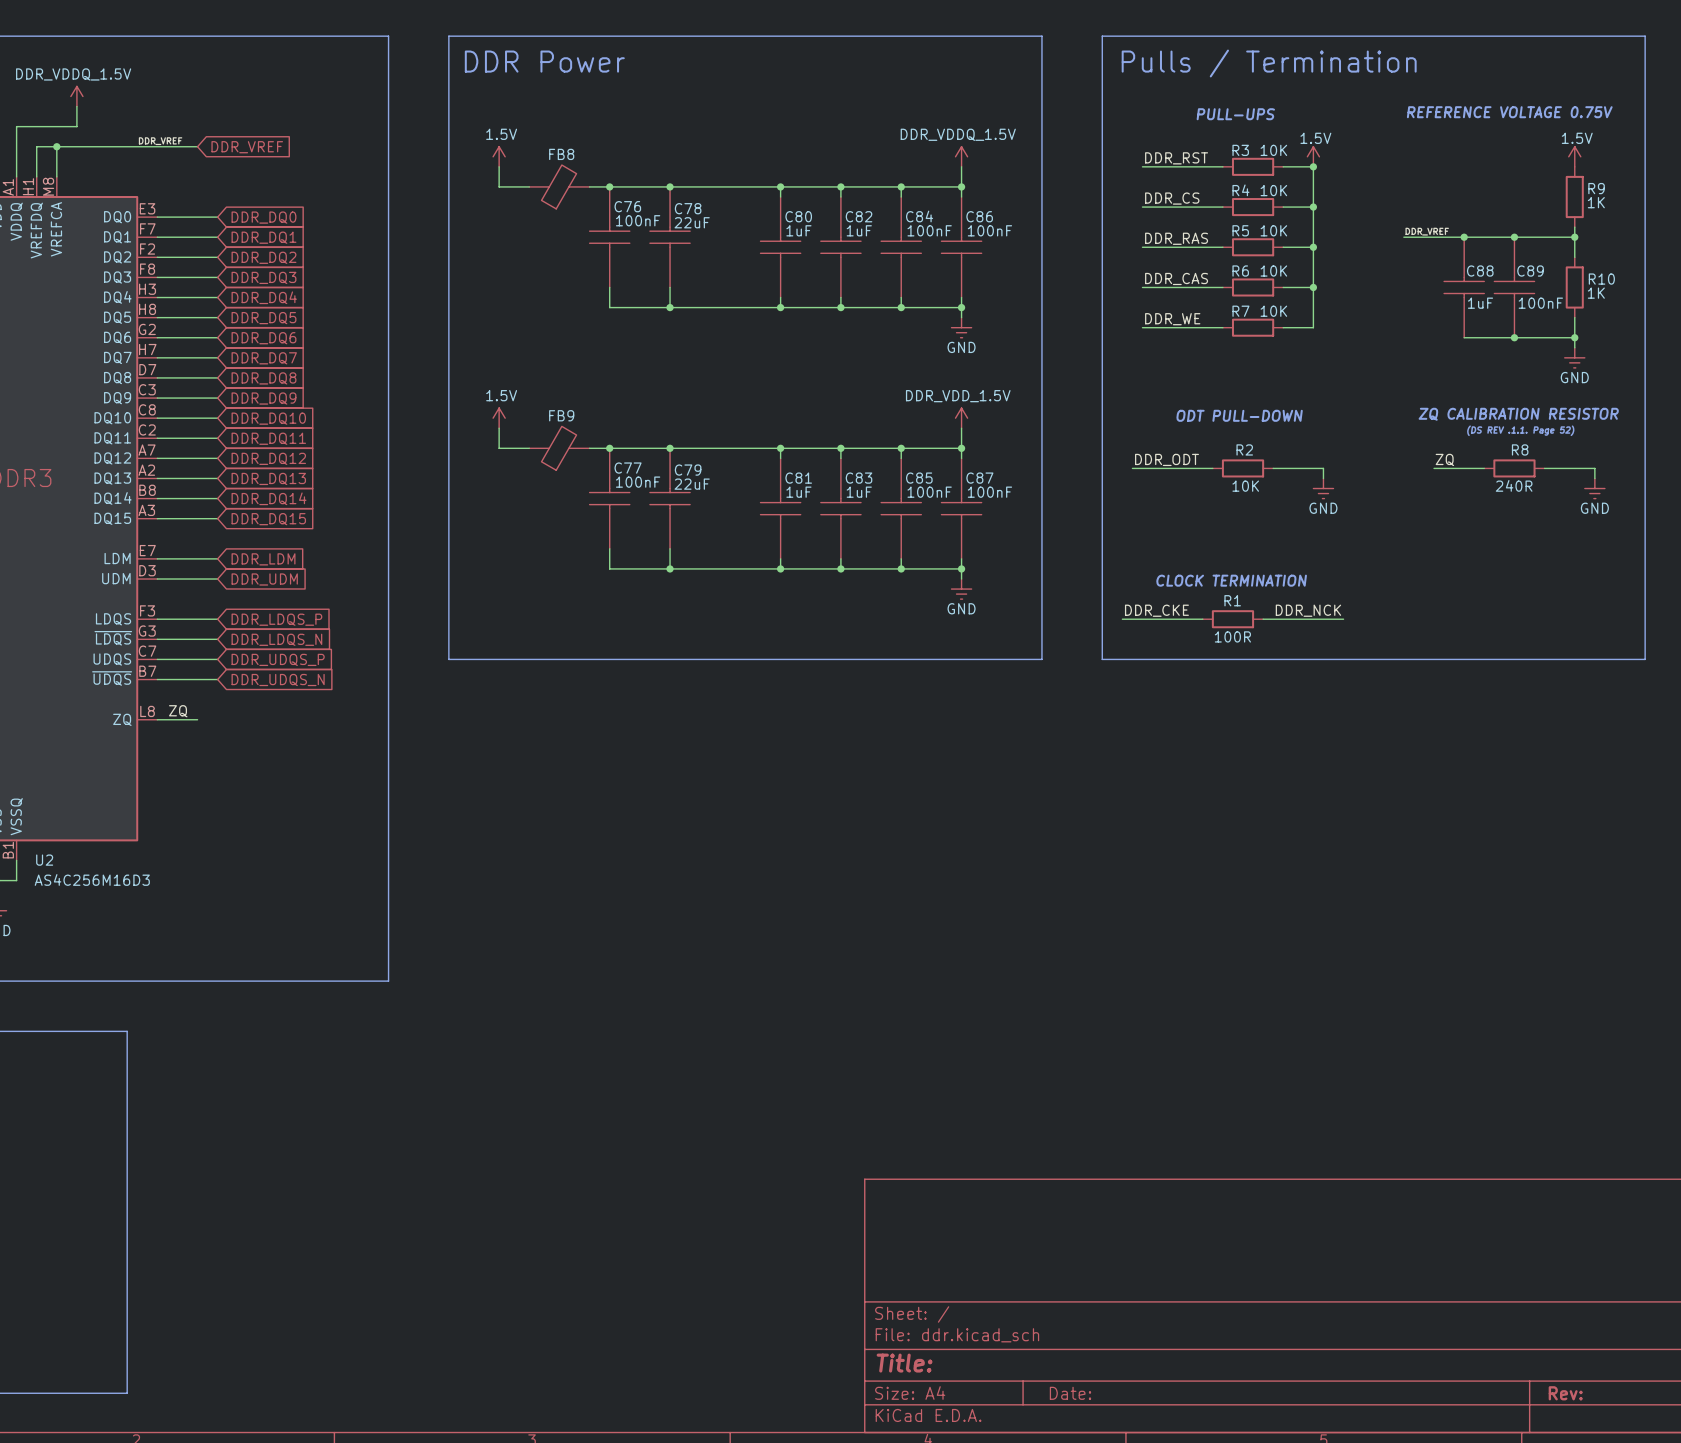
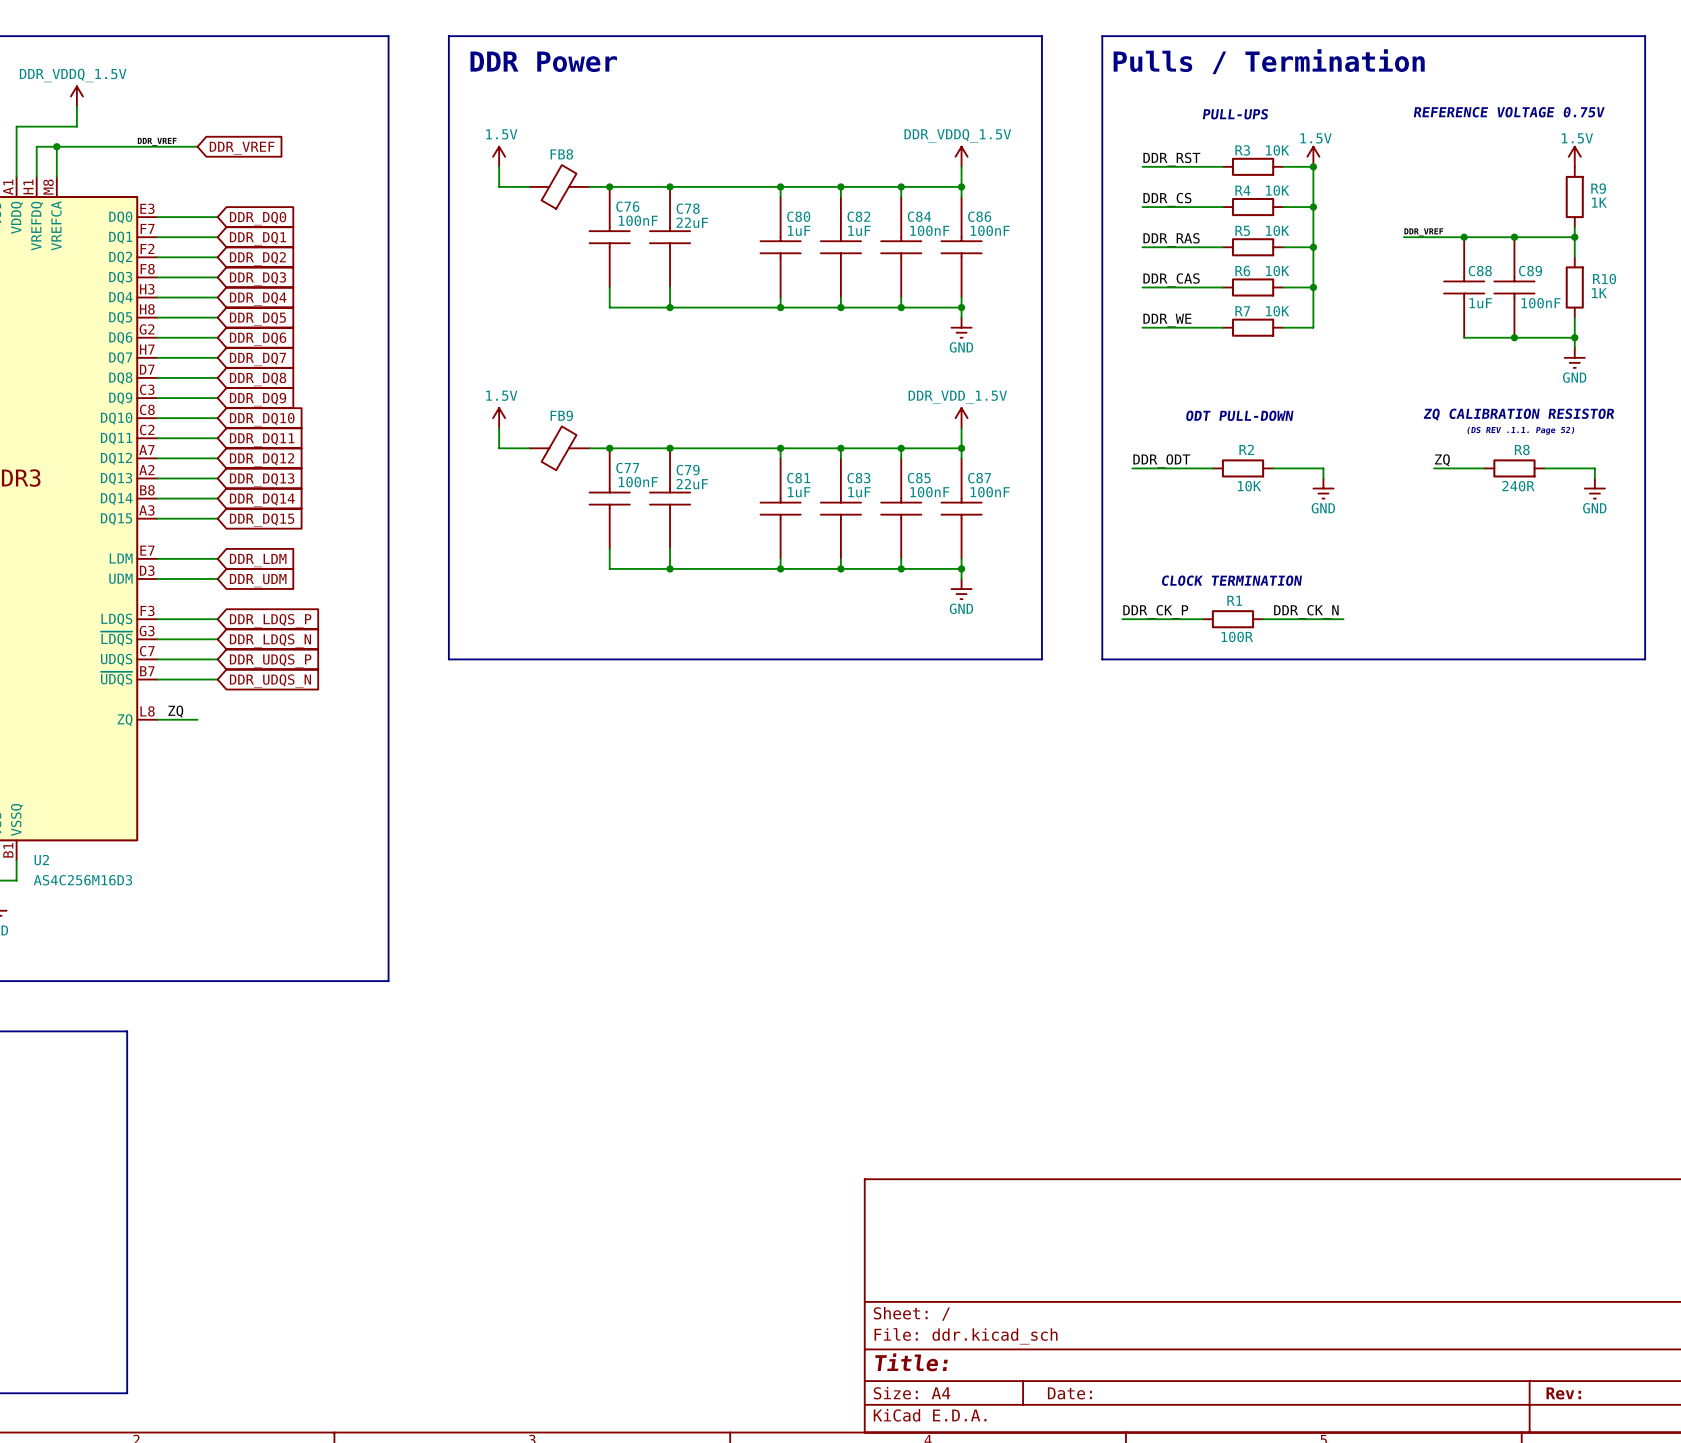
label: DDR_CKE (1156, 610) -> DDR_CK_P (1155, 611)
label: DDR_NCK (1308, 610) -> DDR_CK_N (1306, 611)

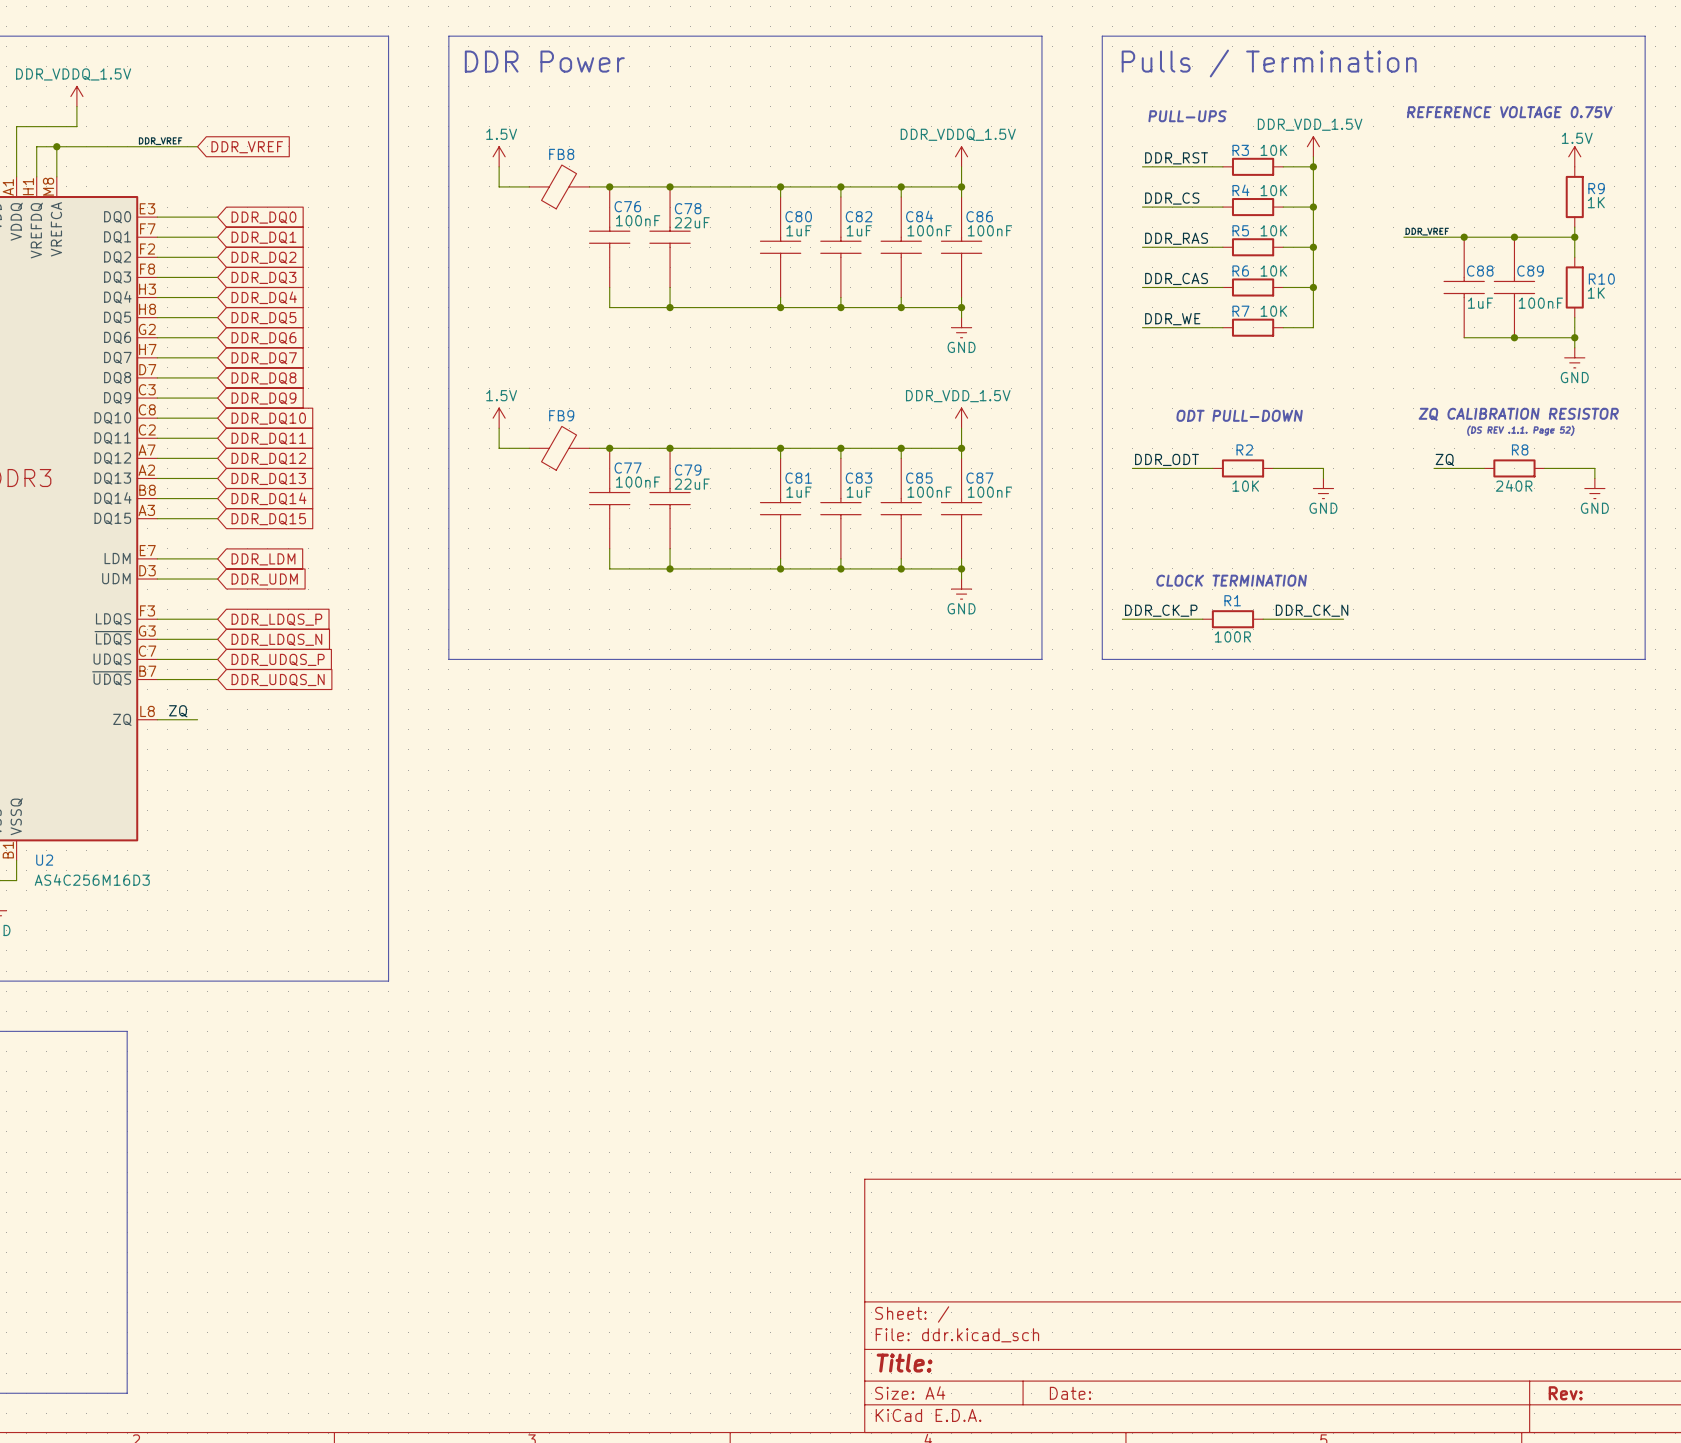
text position: PULL-UPS (1235, 114) -> PULL-UPS (1187, 116)
power symbol: none -> DDR_VDD_1.5V (1313, 146)
power symbol: 1.5V (1313, 156) -> none

